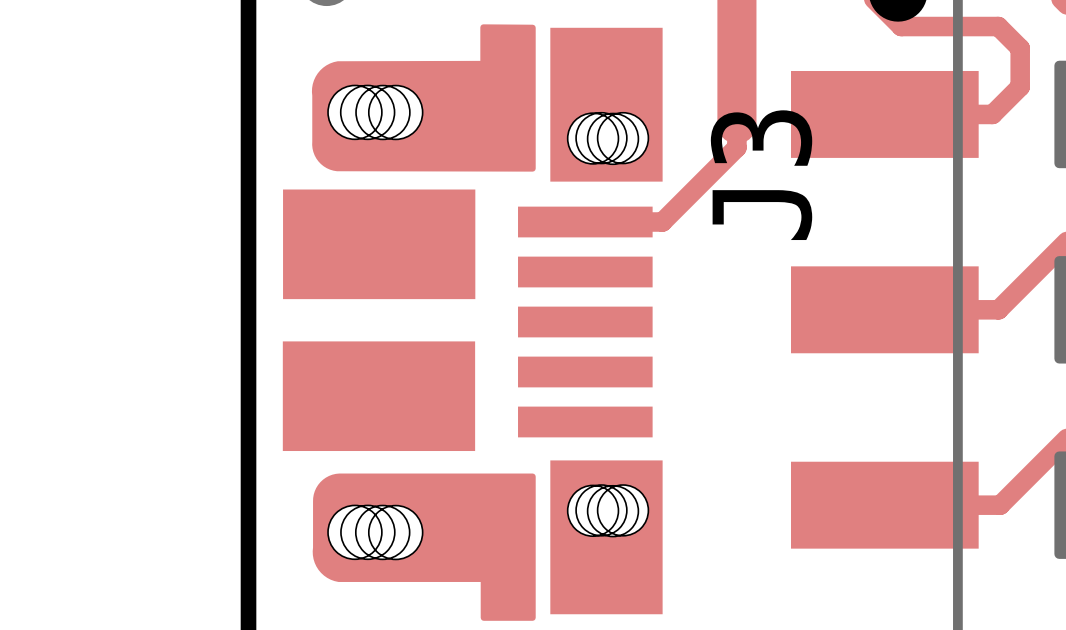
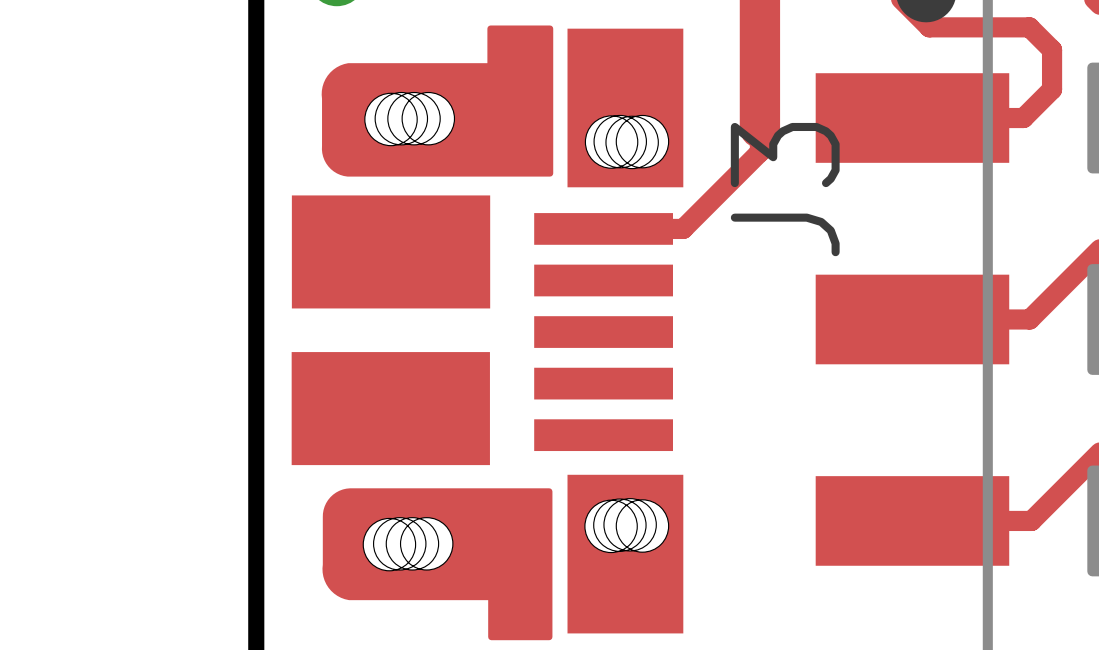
J3 footprint: [282, 24, 663, 621] -> [291, 25, 684, 641]

